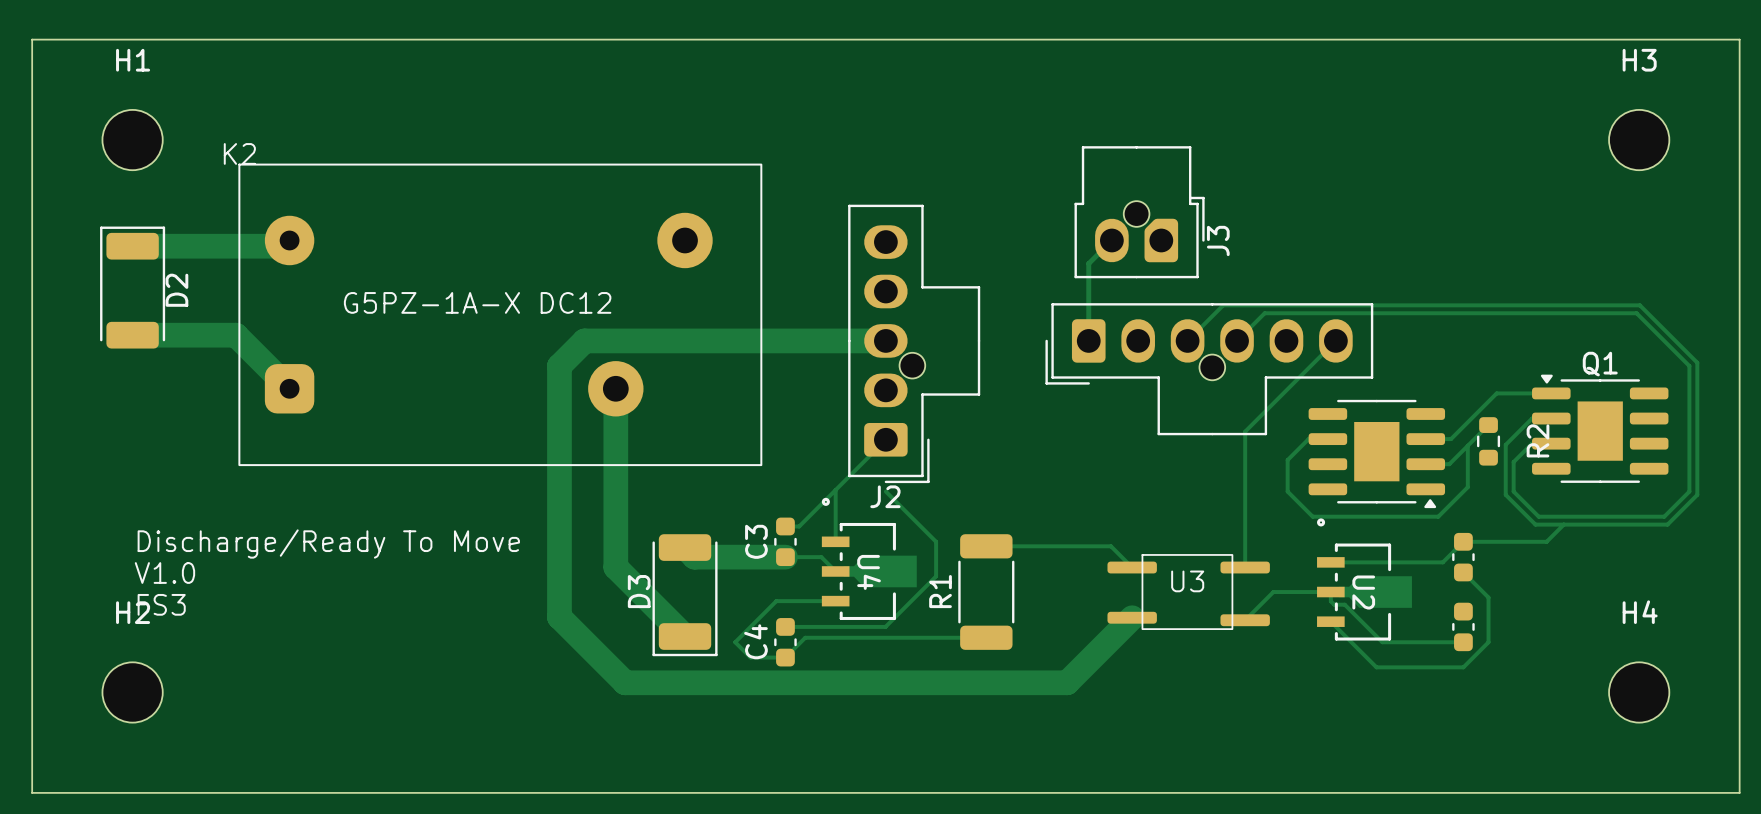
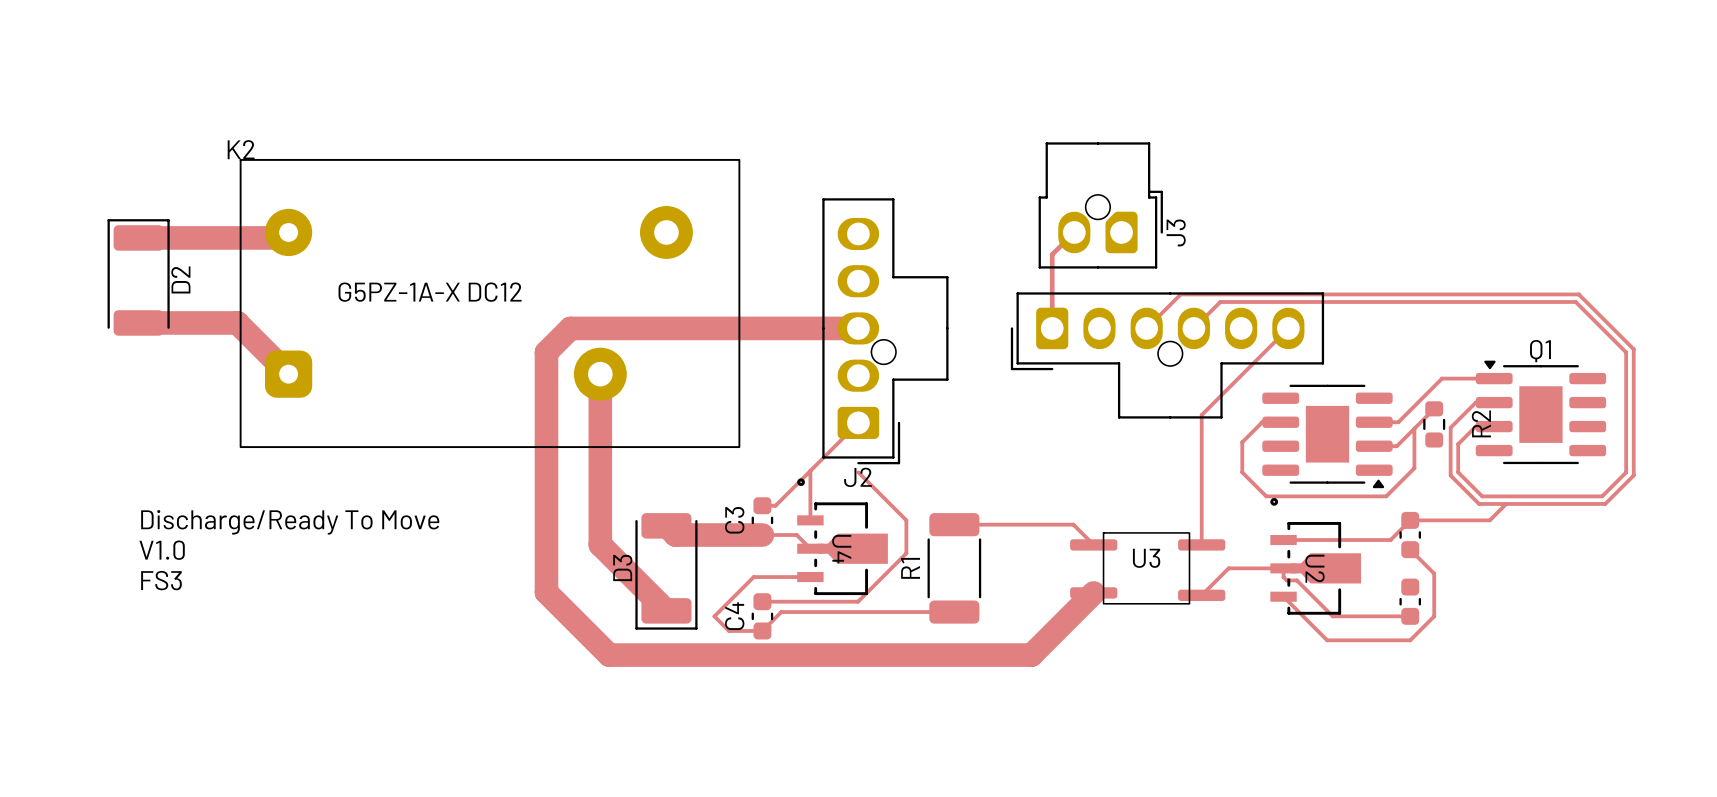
board edge: (32, 39) (1739, 39) (1739, 792) (32, 792) (32, 39) -> none
H1: (132, 140) -> none
H3: (1639, 140) -> none
H2: (132, 692) -> none
H4: (1639, 692) -> none

